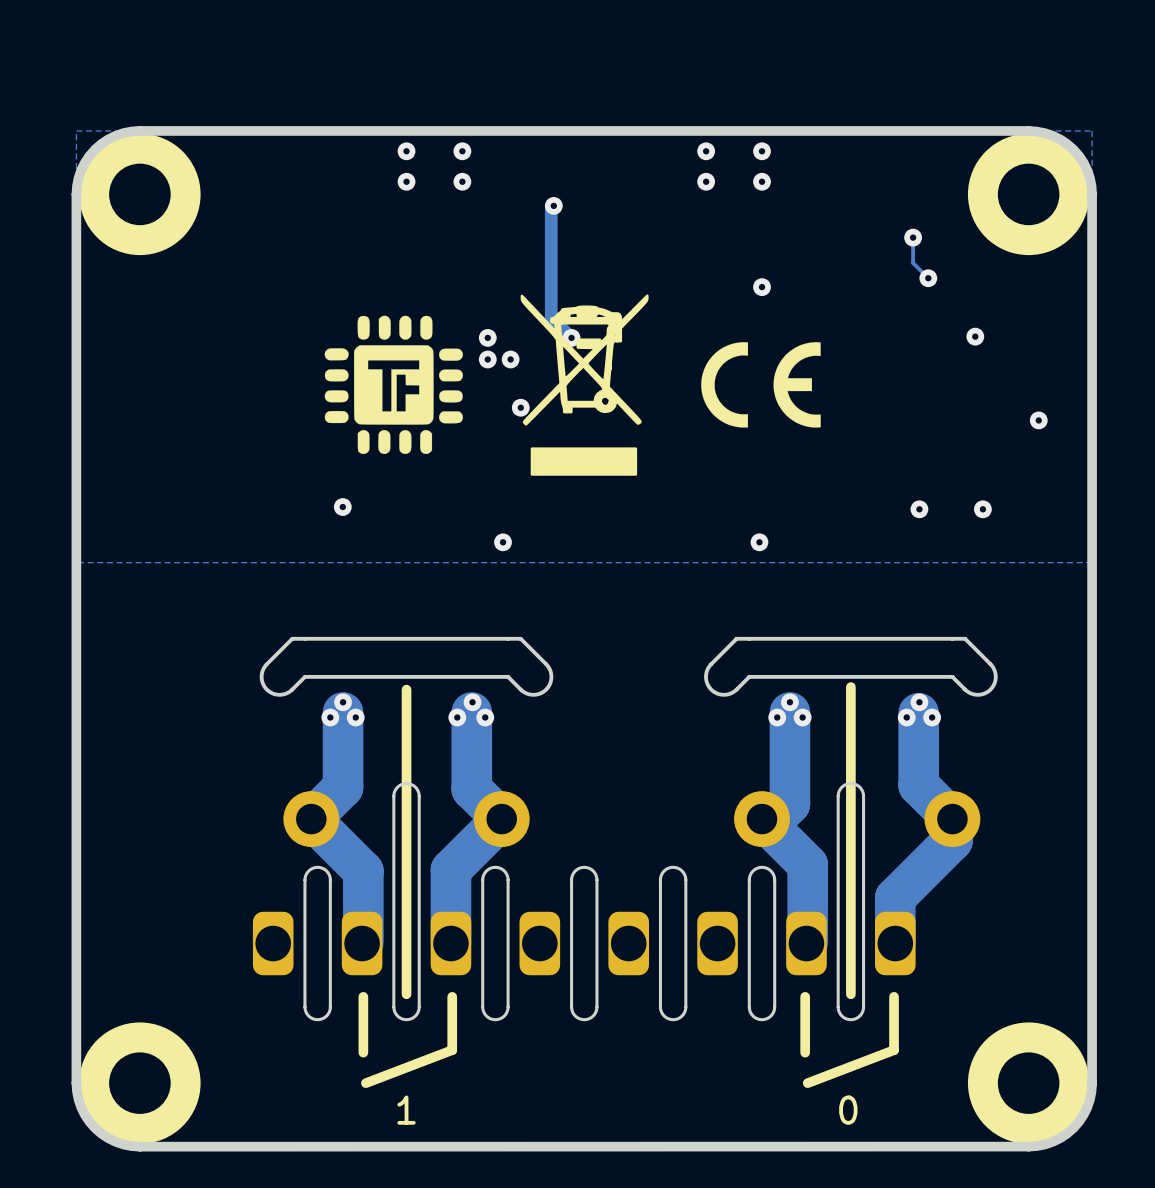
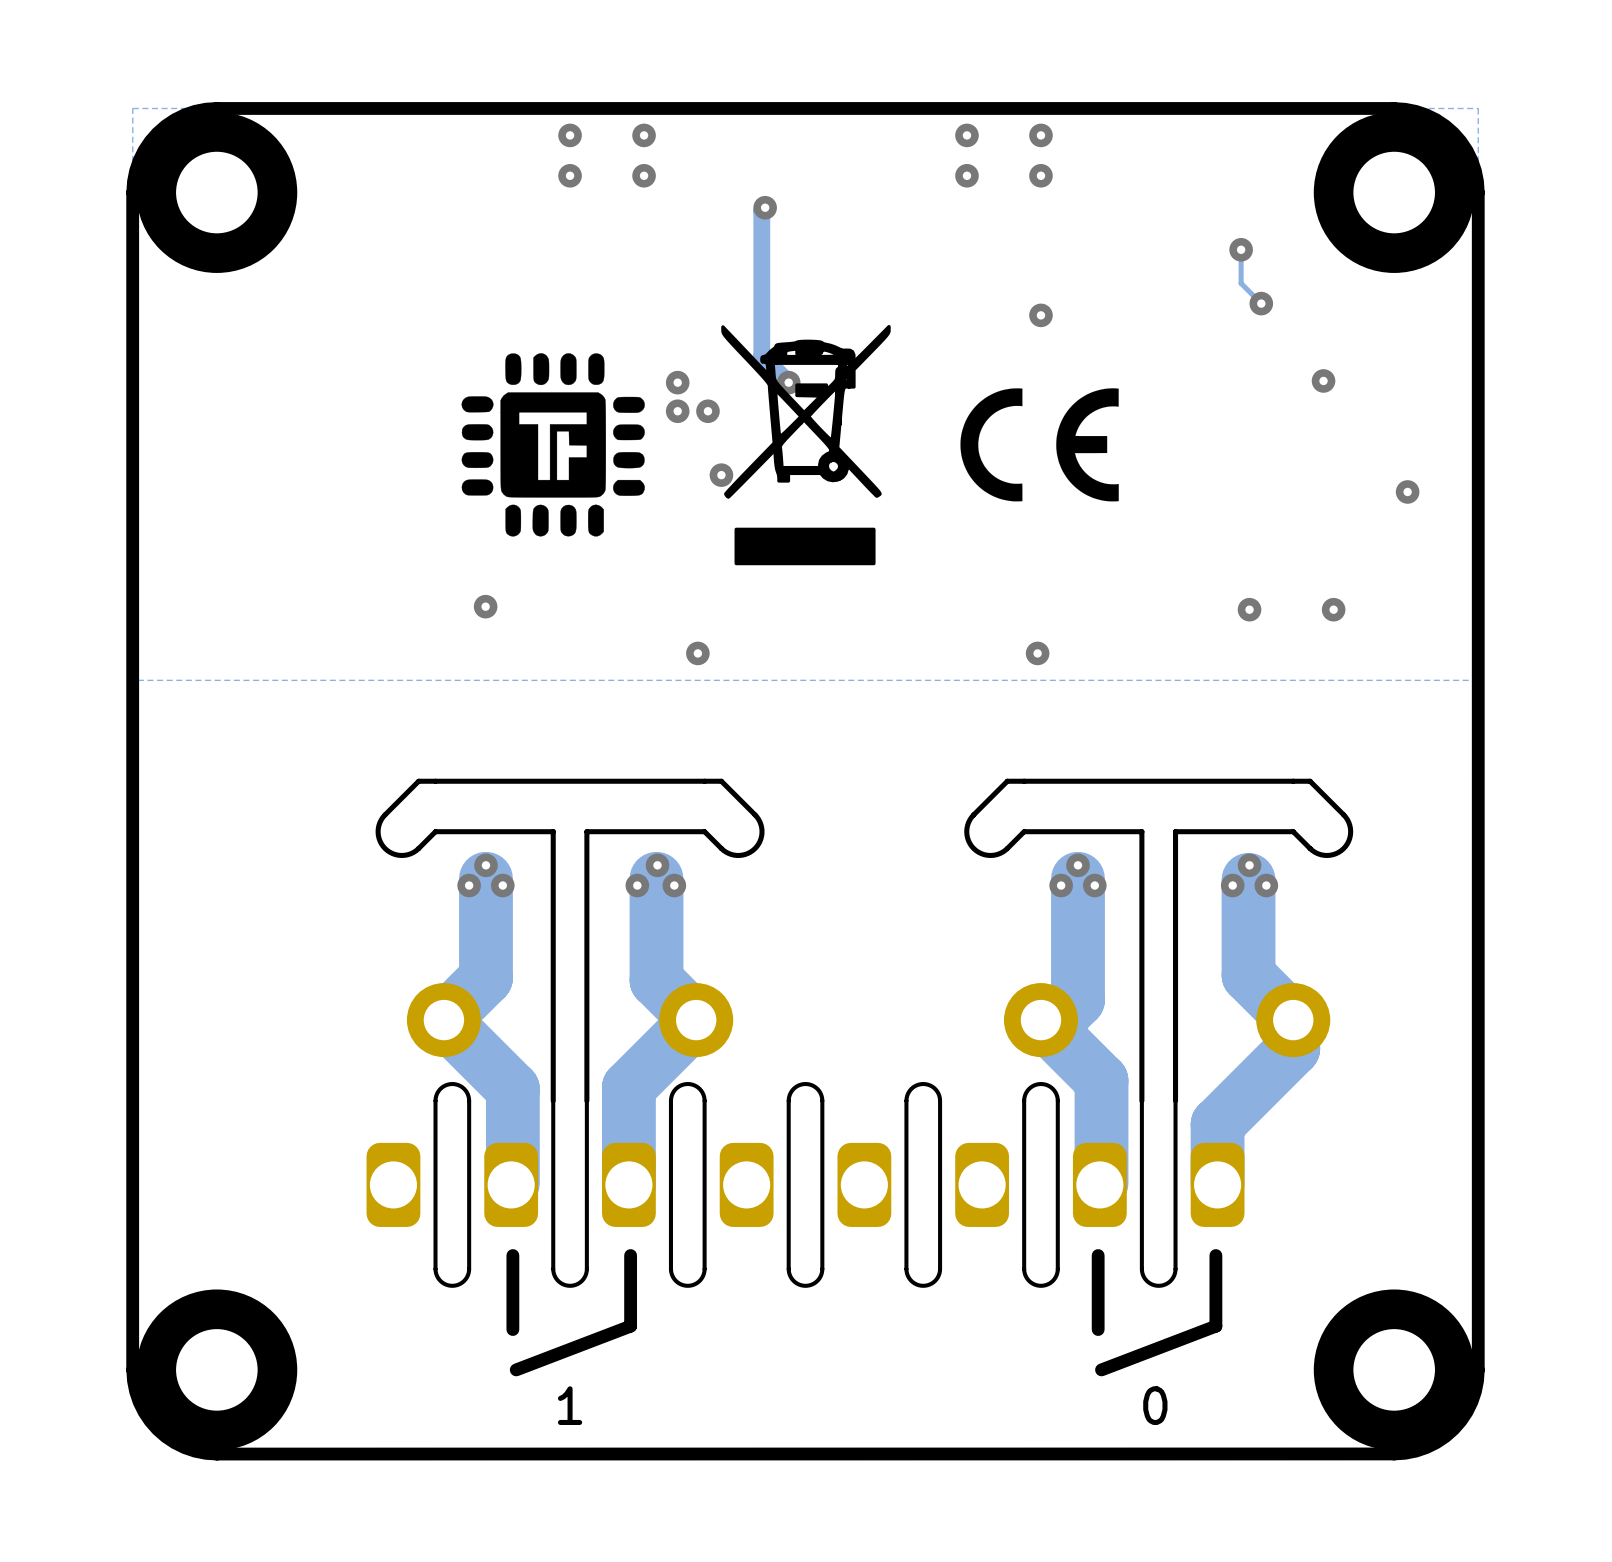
board edge: none -> (553, 831) (553, 1100)
board edge: (419, 676) (393, 676) -> (586, 831) (586, 1100)
board edge: none -> (1141, 831) (1141, 1100)
board edge: (863, 676) (838, 676) -> (1175, 831) (1175, 1100)
line: (850, 687) (850, 994) -> none
line: (406, 689) (406, 994) -> none
part: (584, 901) -> none
part: none -> (805, 1184)

